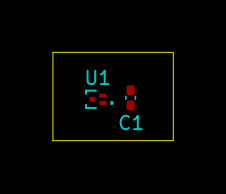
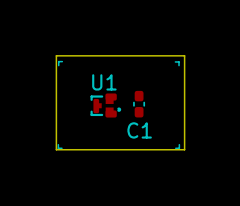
line: none -> (62, 61) (58, 61) (58, 65)
line: none -> (175, 61) (179, 61) (179, 65)
part: none -> (111, 97)
part: none -> (96, 106)
part: none -> (111, 113)
line: none -> (58, 144) (58, 148) (61, 148)
line: none -> (179, 144) (179, 148) (175, 148)

